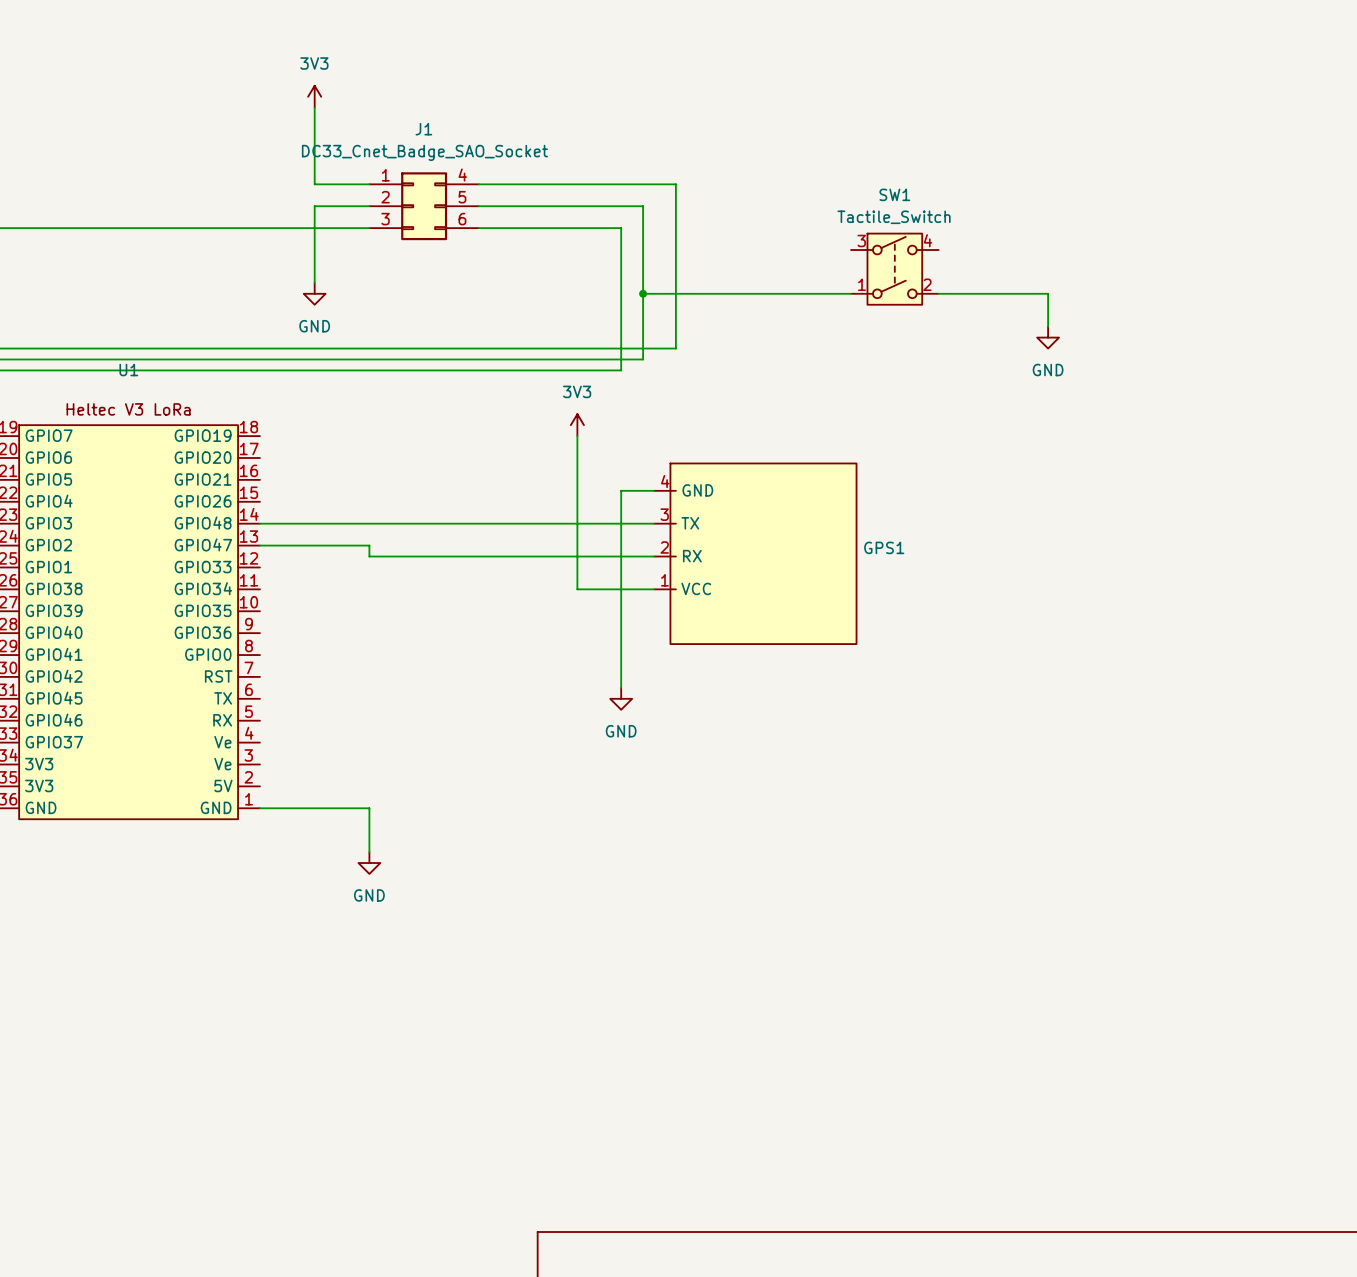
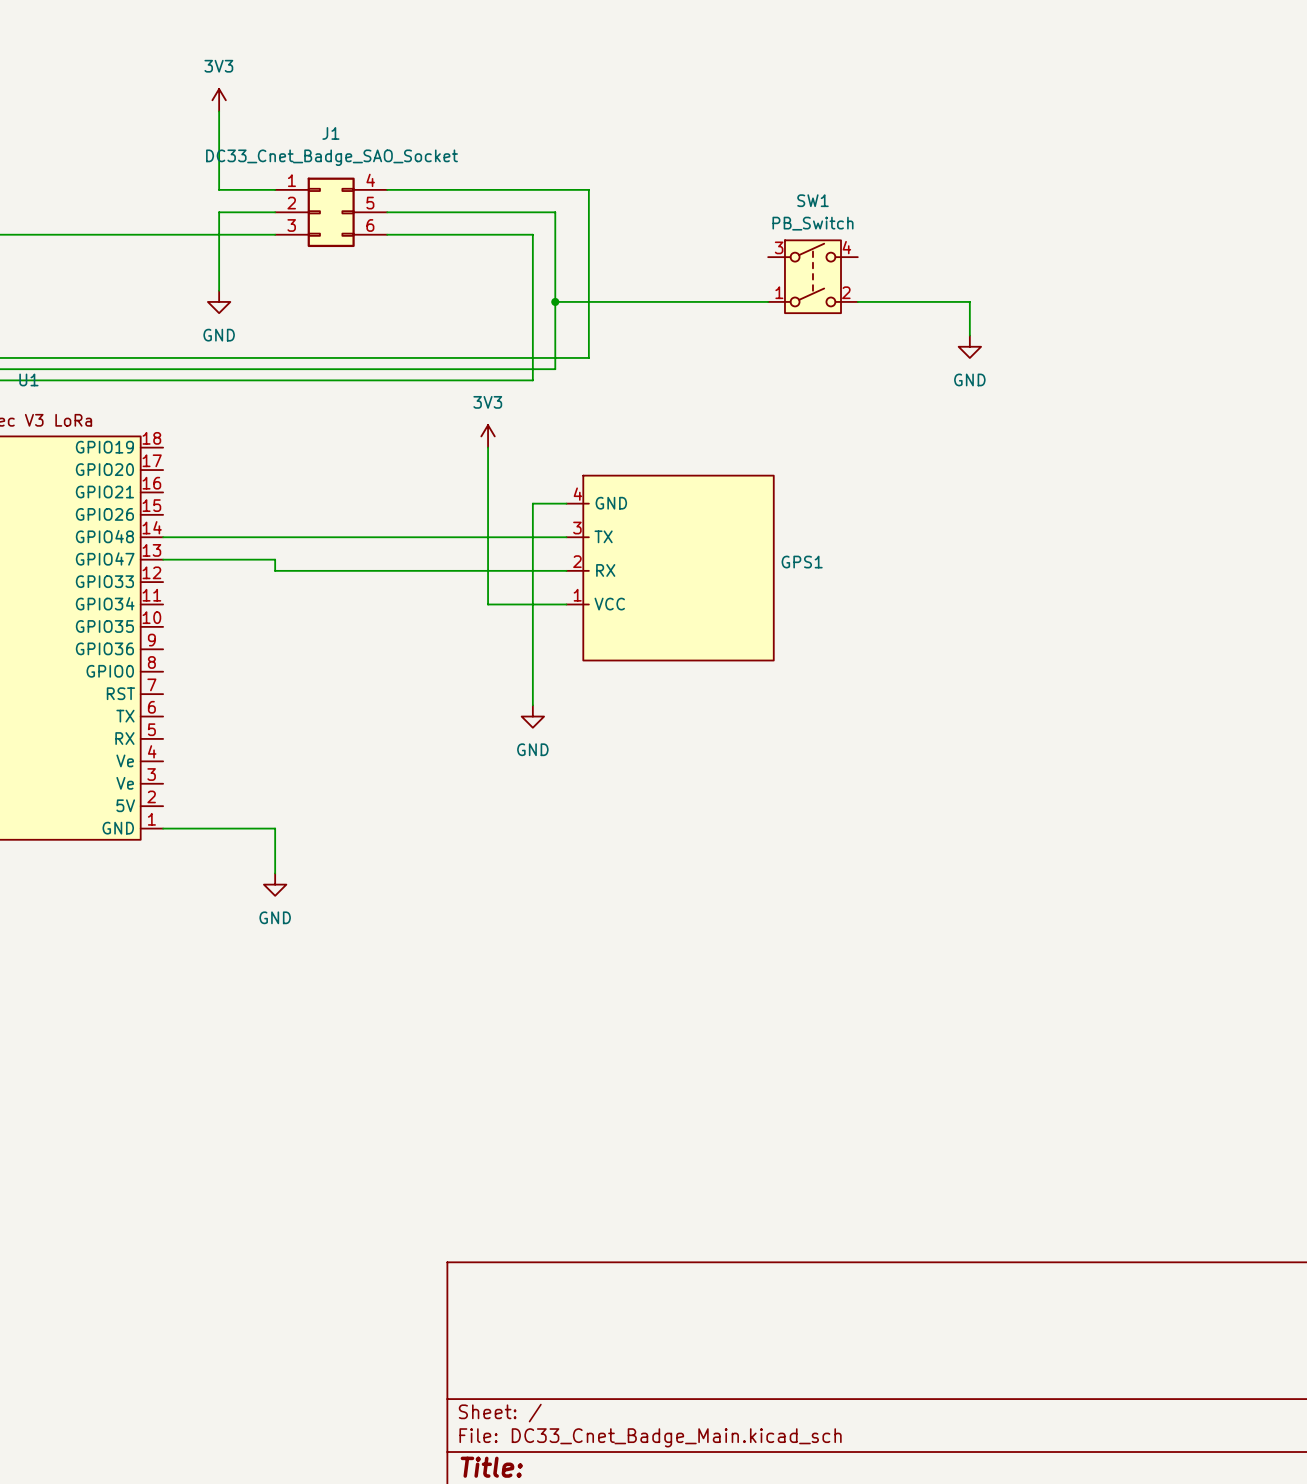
SW1 value: Tactile_Switch (894, 217) -> PB_Switch (812, 223)

